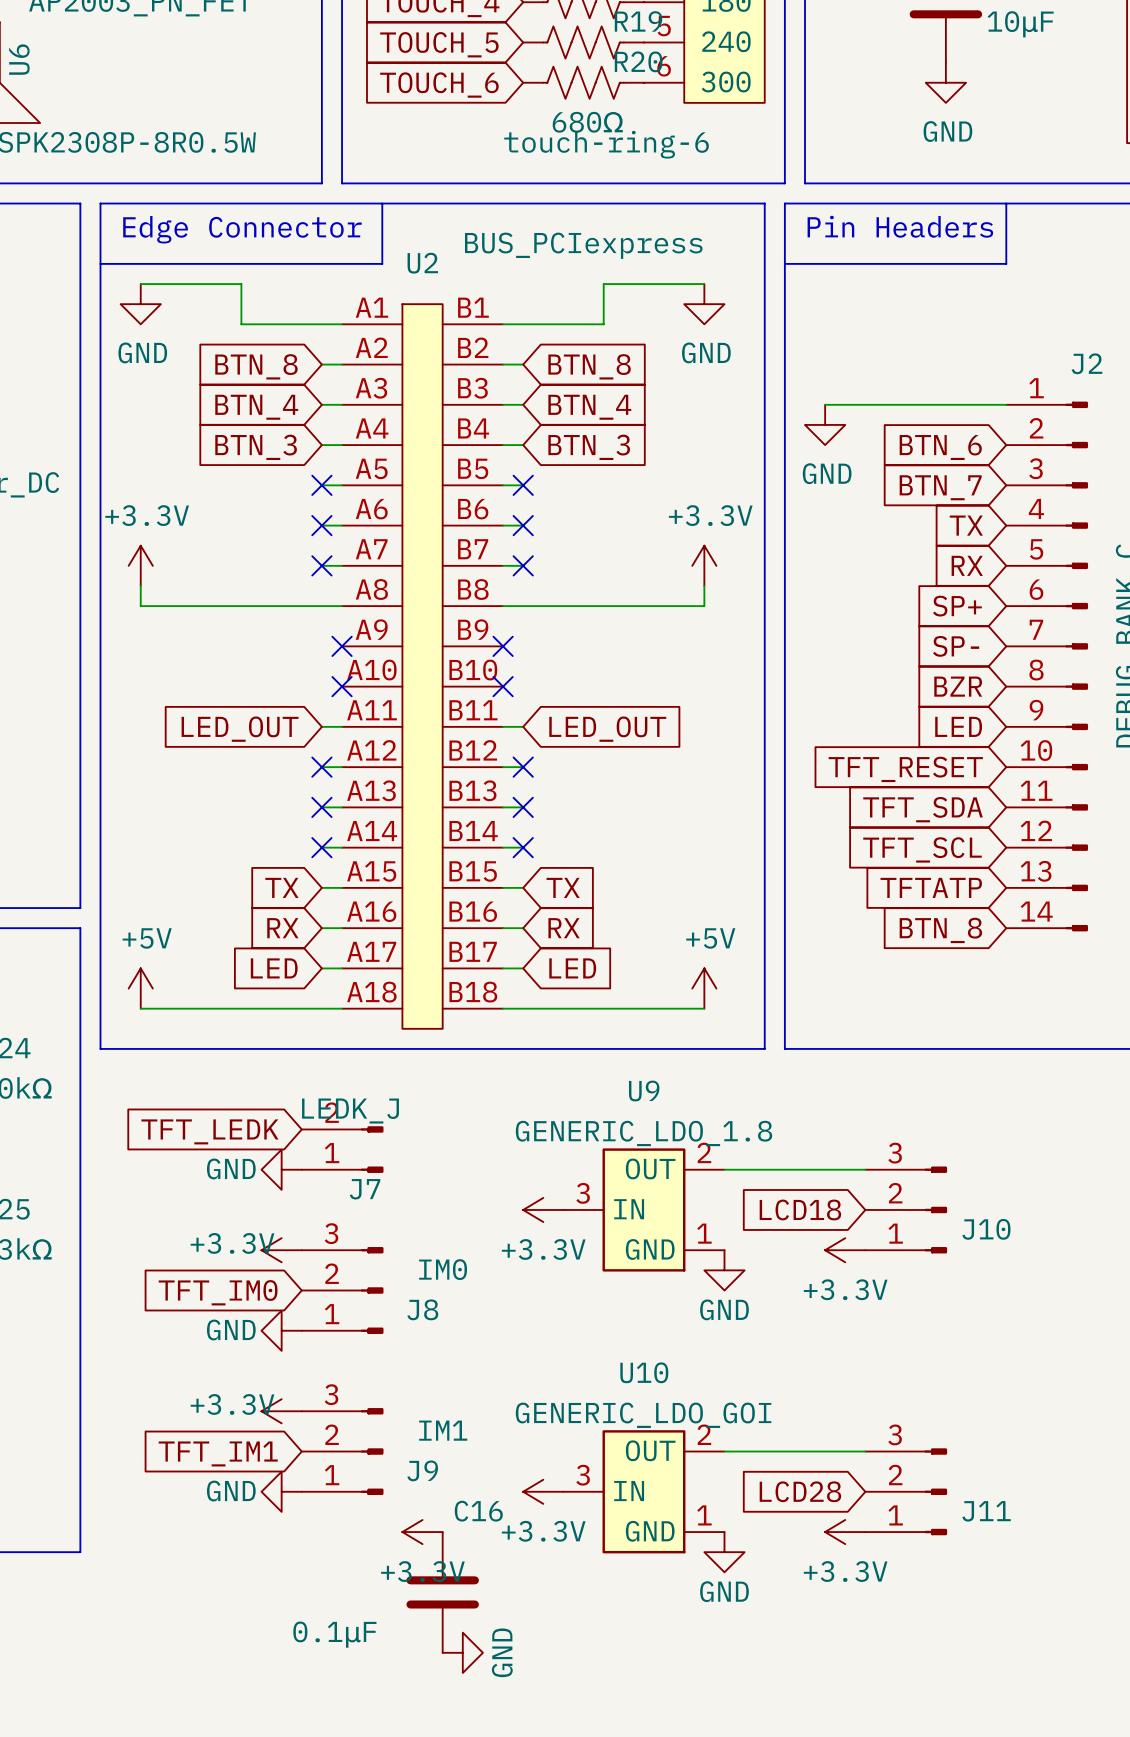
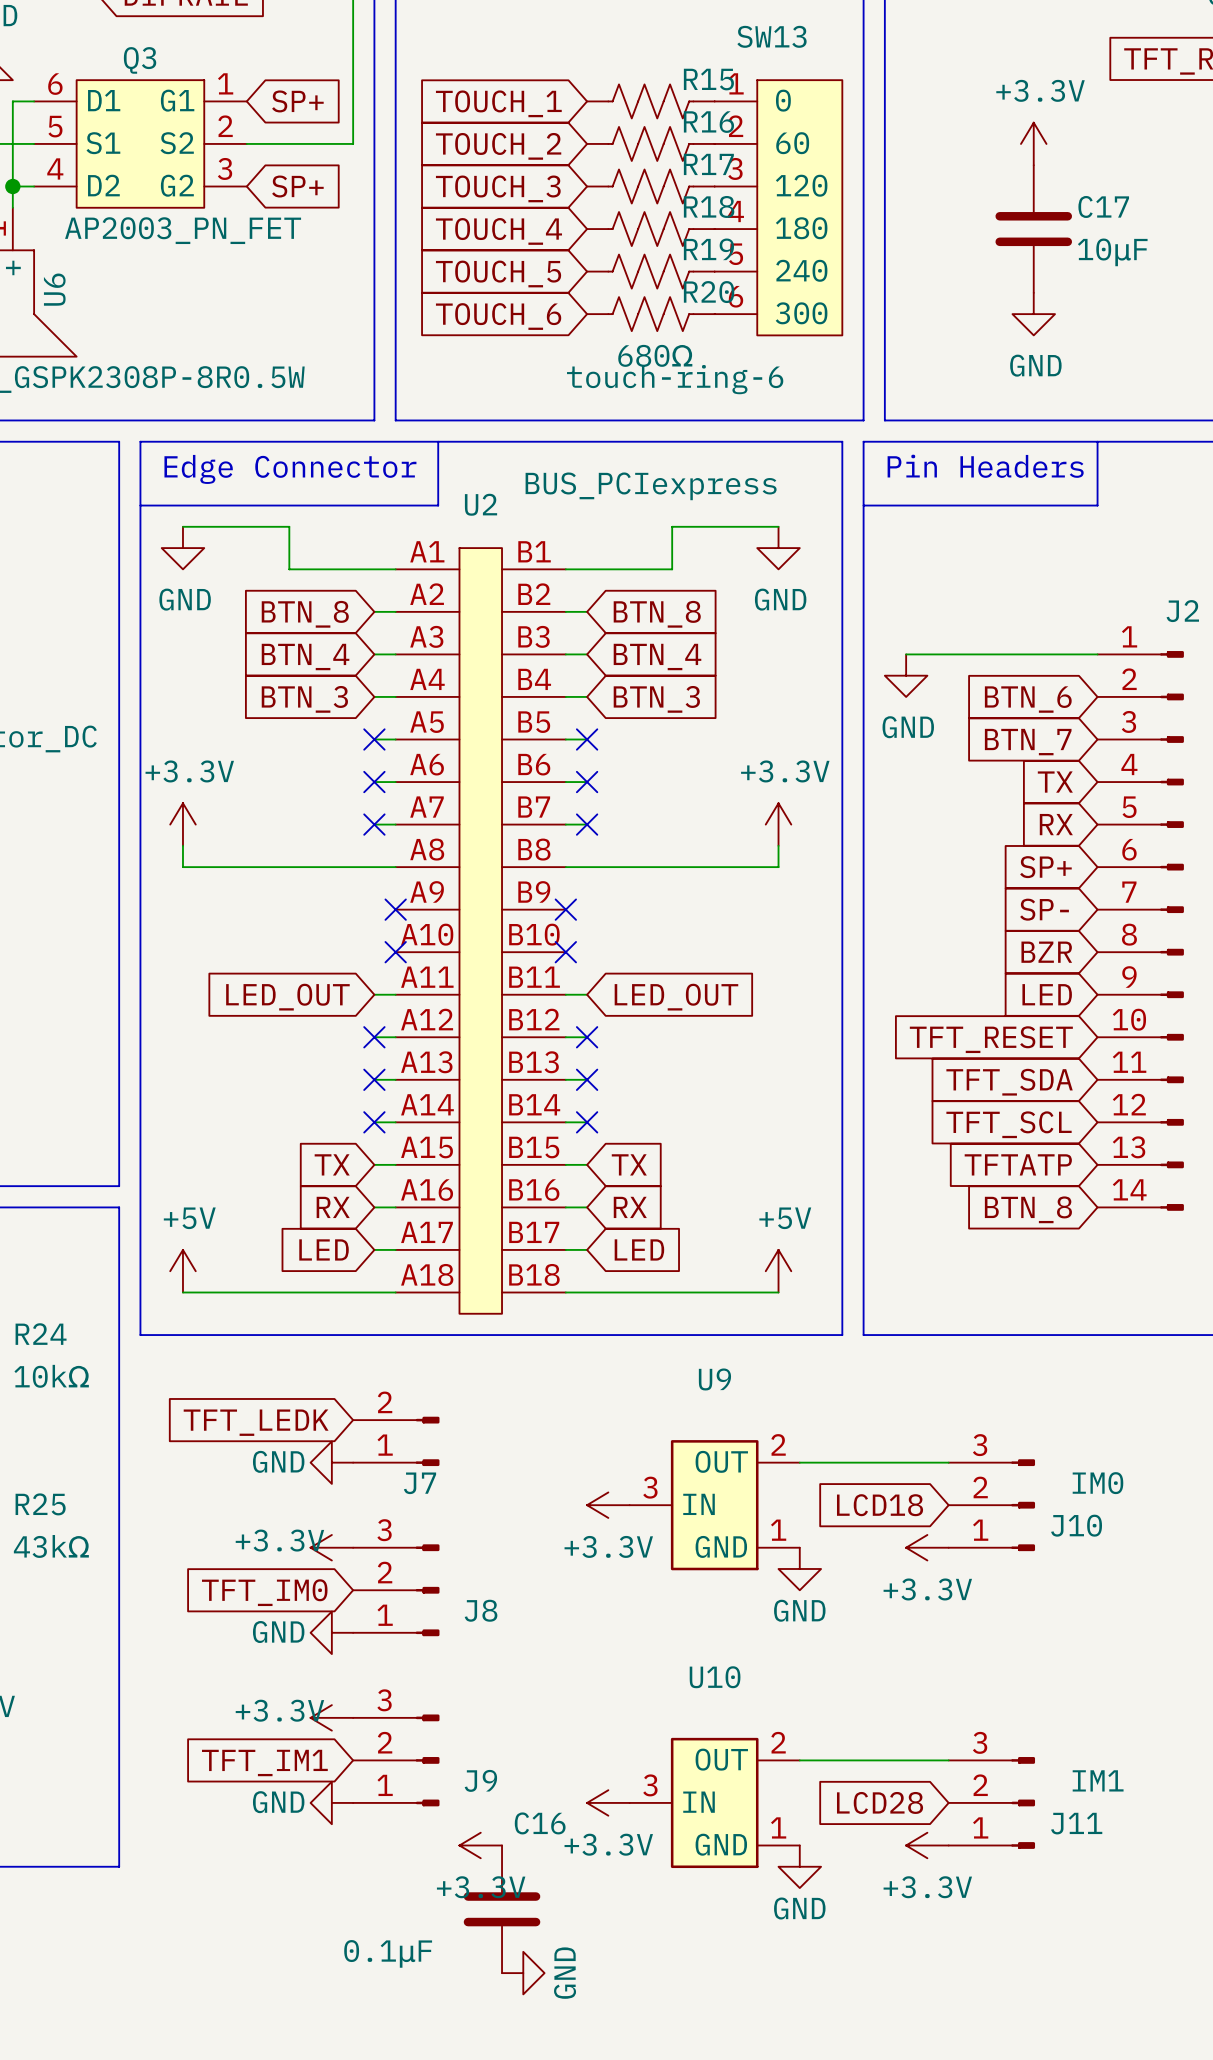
J7 value: LEDK_J (350, 1111) -> none
U9 value: GENERIC_LDO_1.8 (643, 1133) -> none
J10 value: none -> IM0 (1097, 1483)
J8 value: IM0 (443, 1269) -> none
U10 value: GENERIC_LDO_GOI (643, 1415) -> none
J9 value: IM1 (443, 1430) -> none
J11 value: none -> IM1 (1098, 1780)

